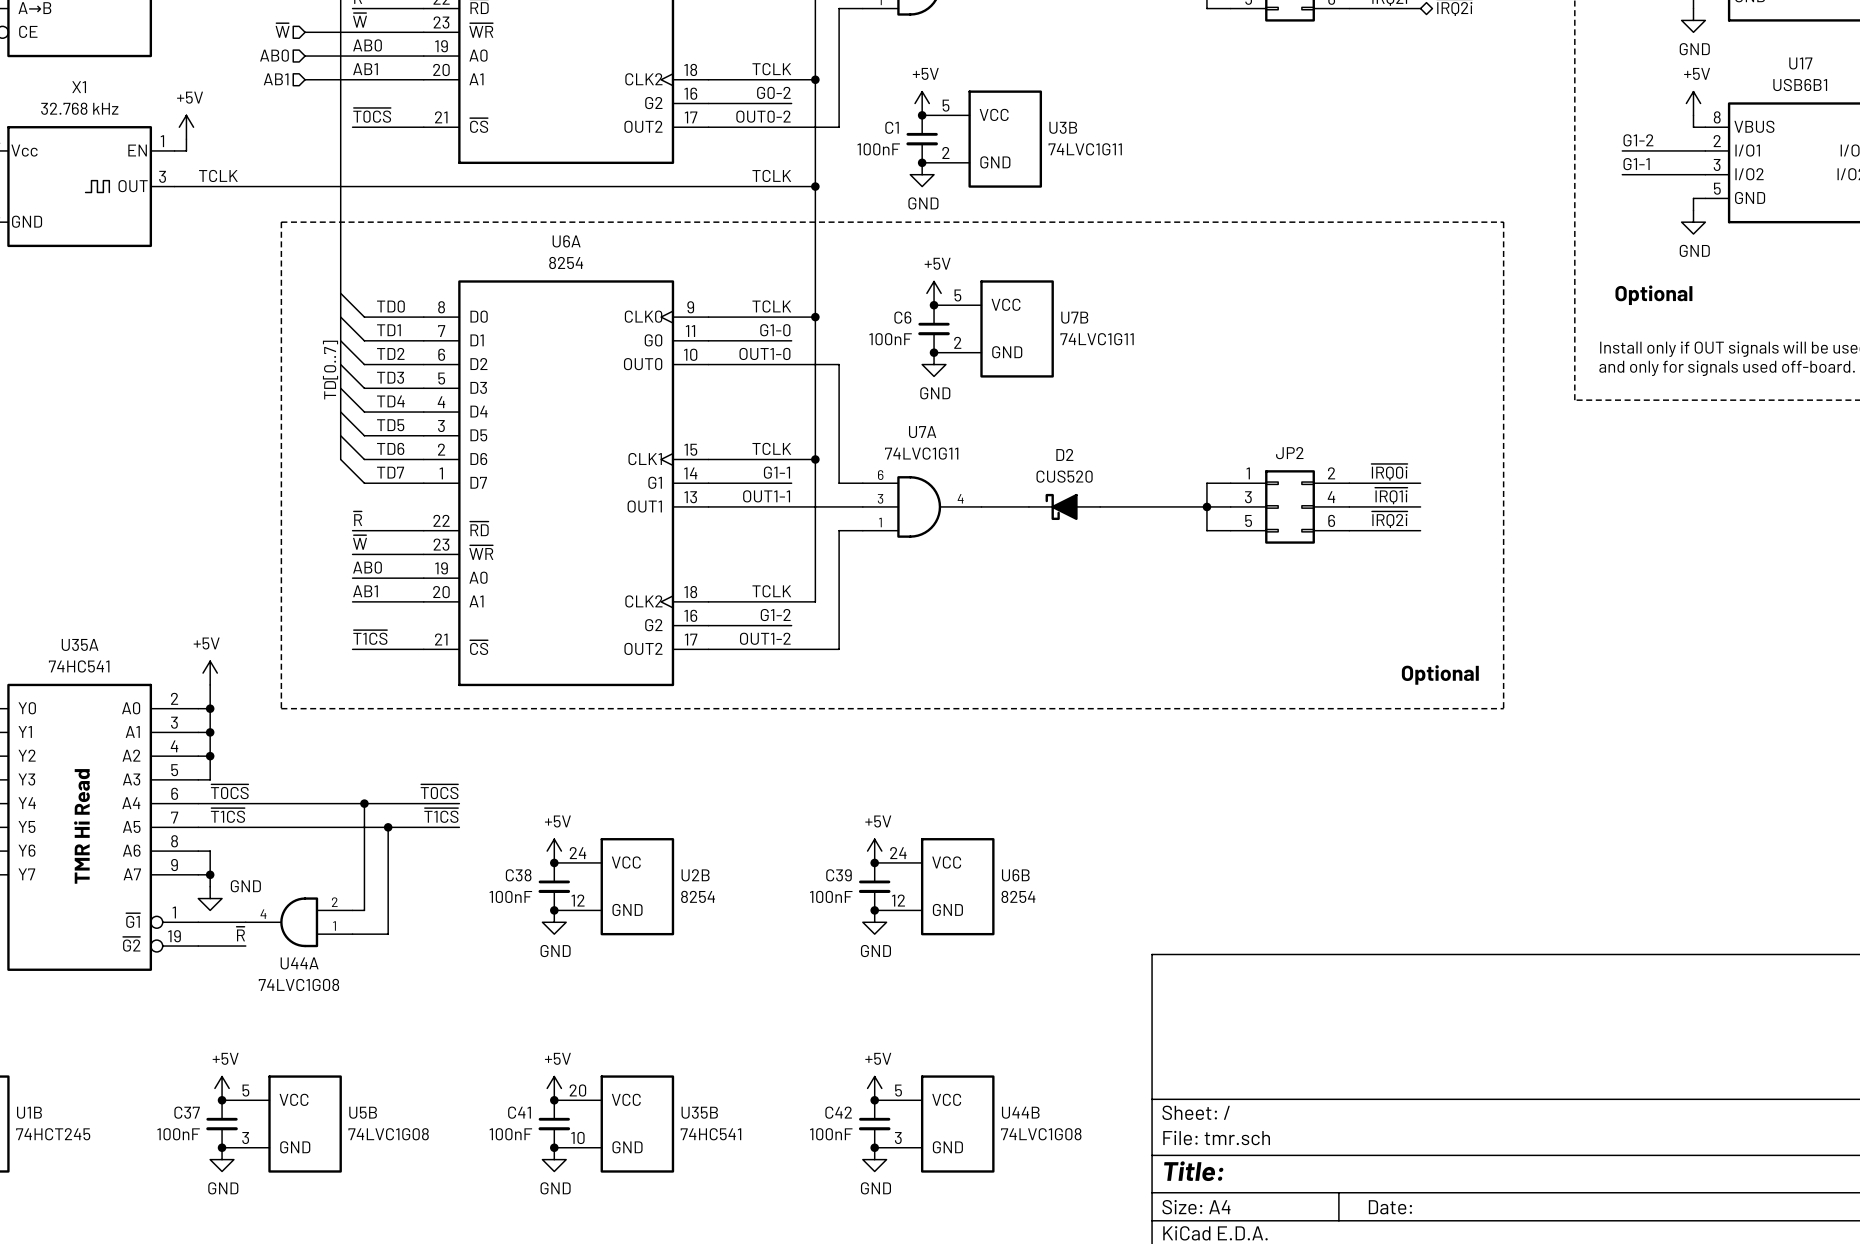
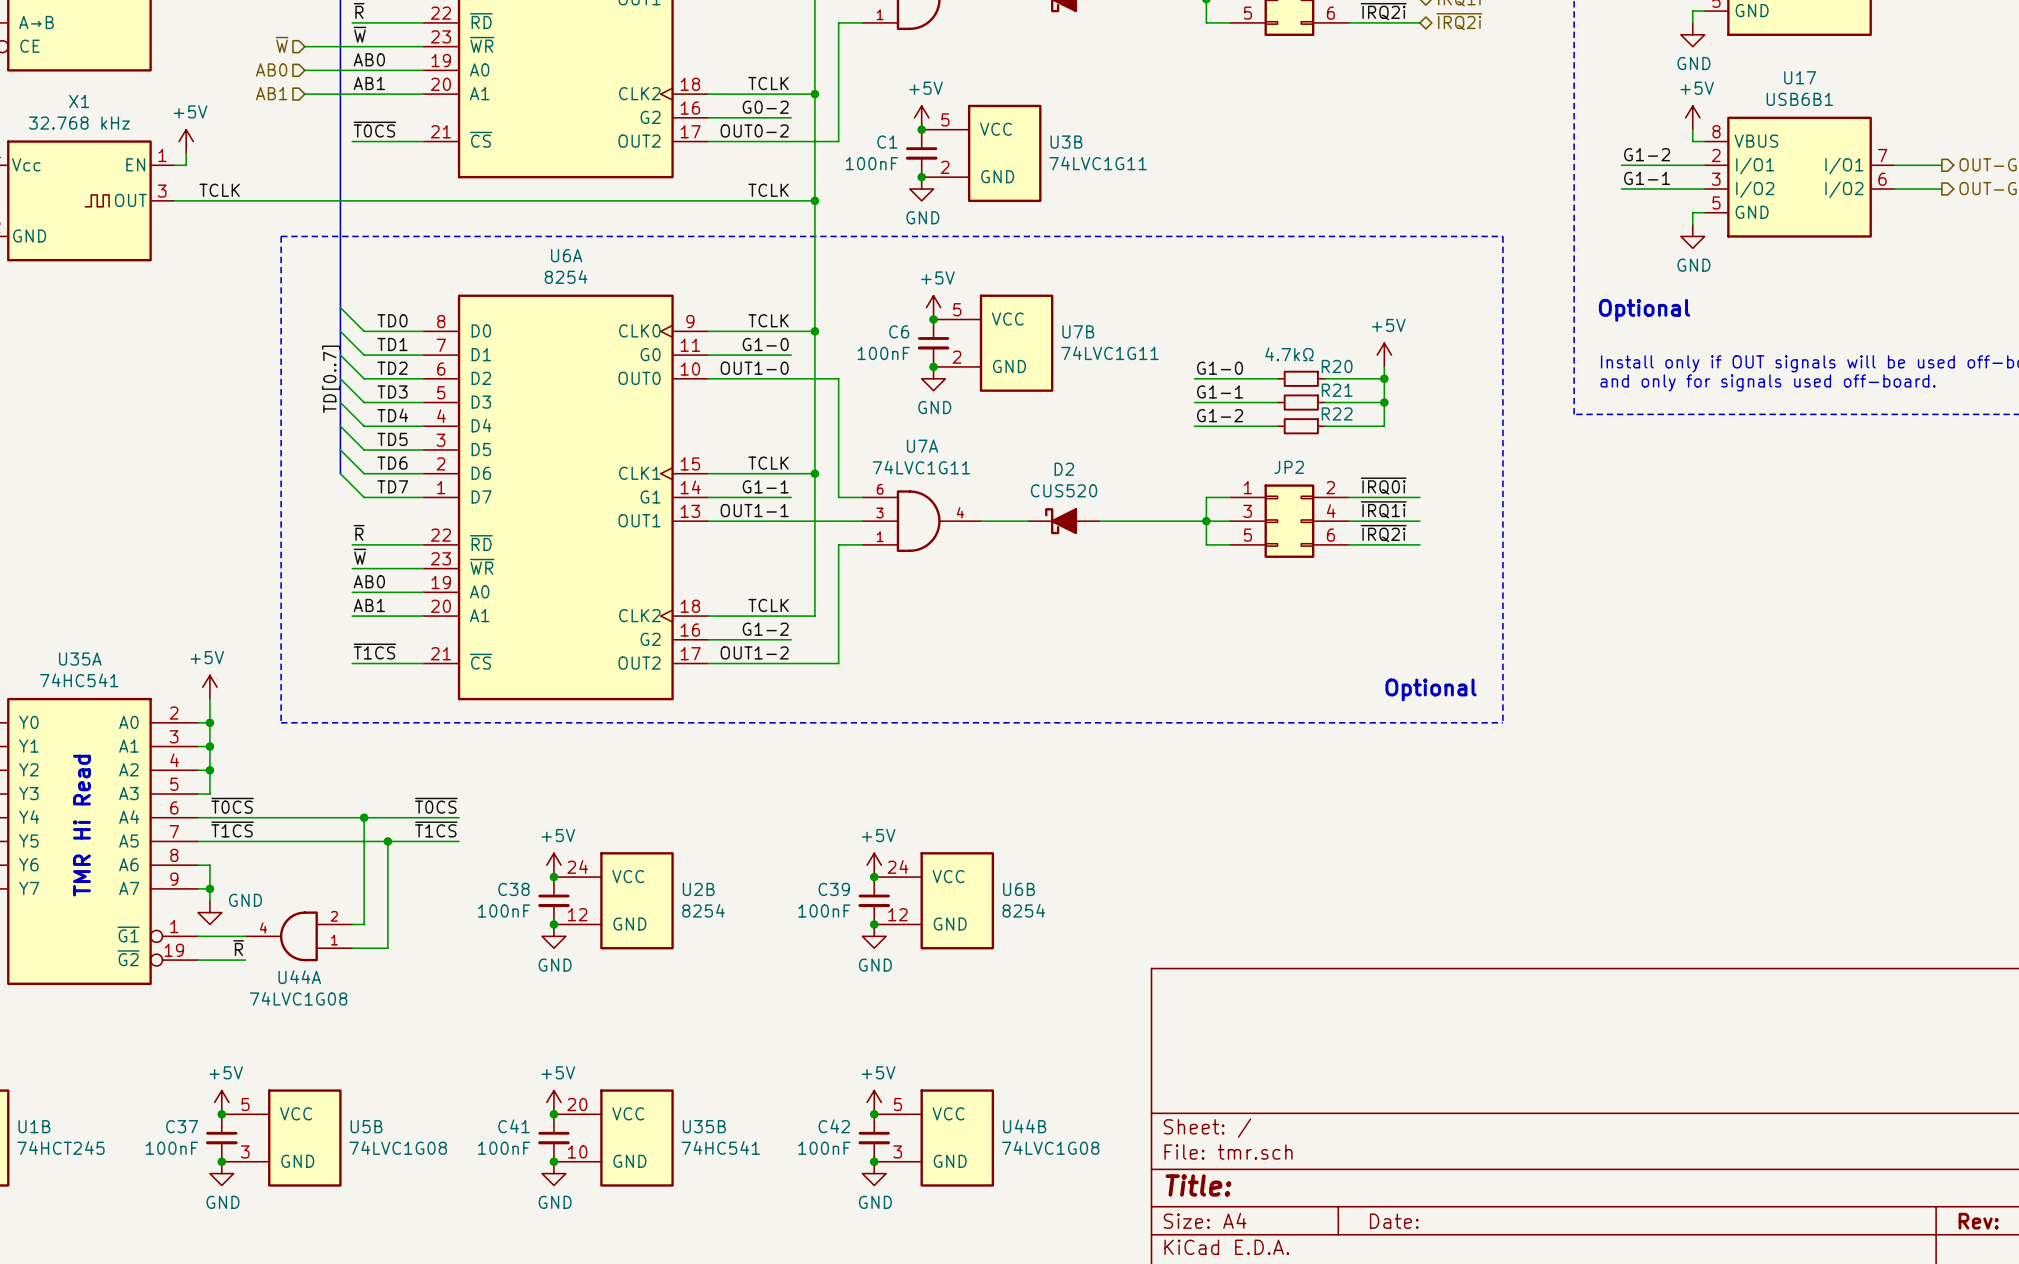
power symbol: none -> +5V (1384, 355)
wire: none -> (1384, 366) (1384, 426) (1325, 426)
label: none -> G1-0 (1220, 368)
wire: none -> (1194, 378) (1277, 378)
R20: none -> 4.7kΩ (1301, 378)
wire: none -> (1325, 378) (1384, 378)
junction: none -> (1384, 378)
label: none -> G1-1 (1220, 391)
wire: none -> (1194, 402) (1277, 402)
R21: none -> (1301, 402)
wire: none -> (1325, 402) (1384, 402)
junction: none -> (1384, 402)
label: none -> G1-2 (1220, 415)
wire: none -> (1194, 426) (1277, 426)
R22: none -> (1301, 426)

